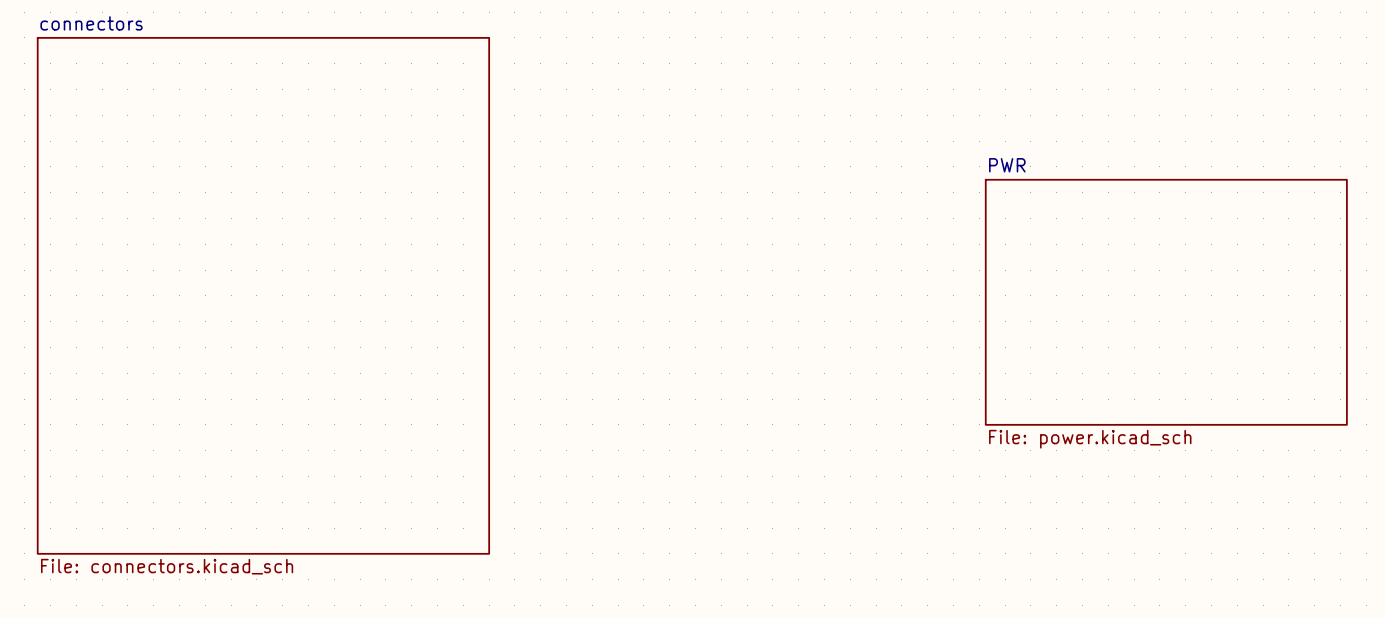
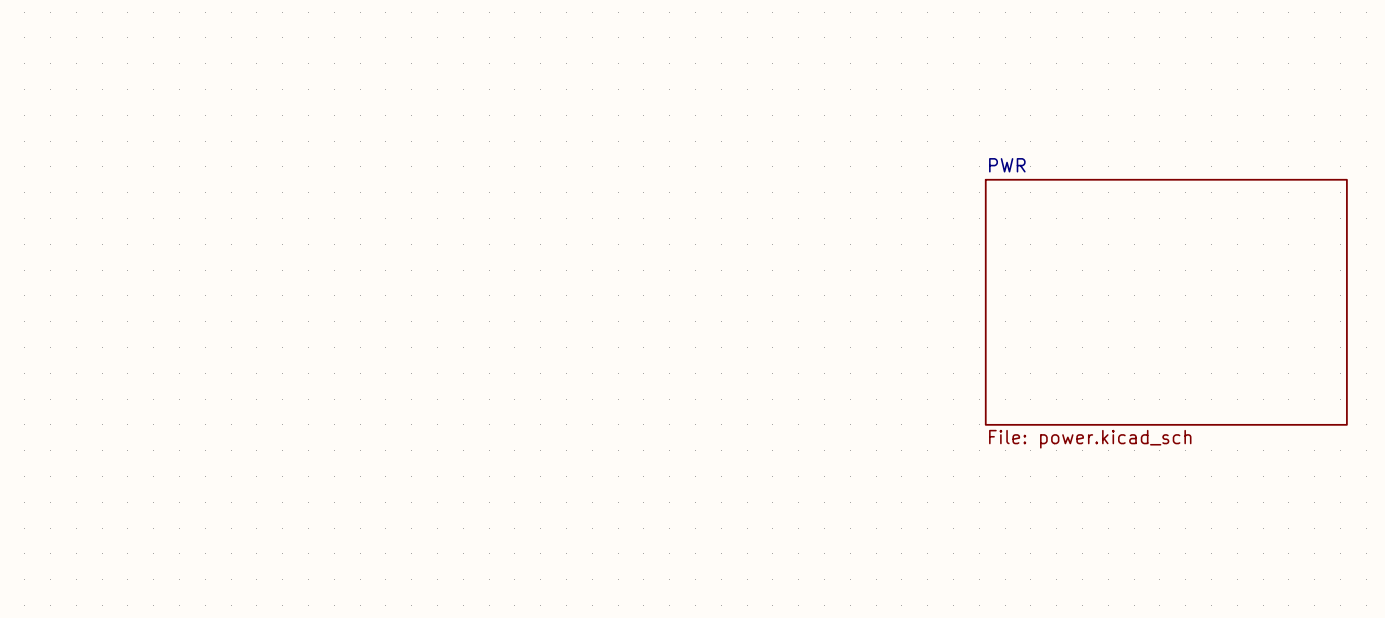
sheet connectors: File: connectors.kicad_sch (263, 295) -> none

